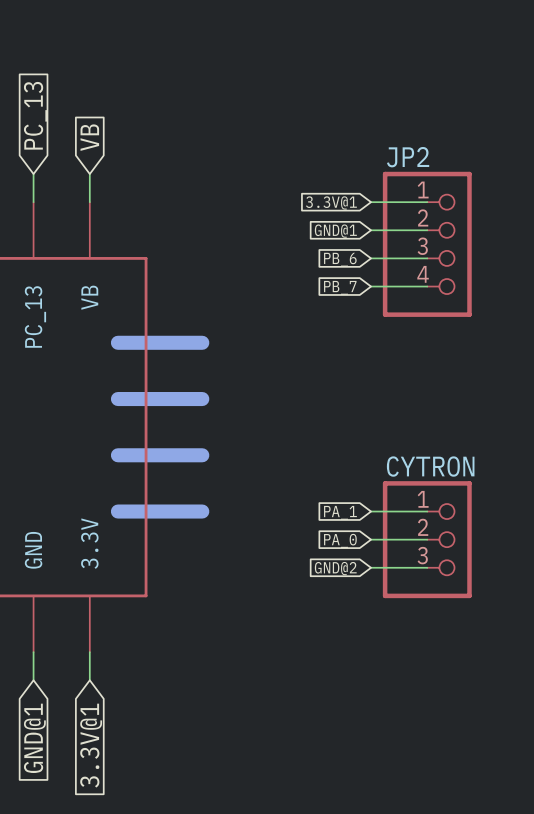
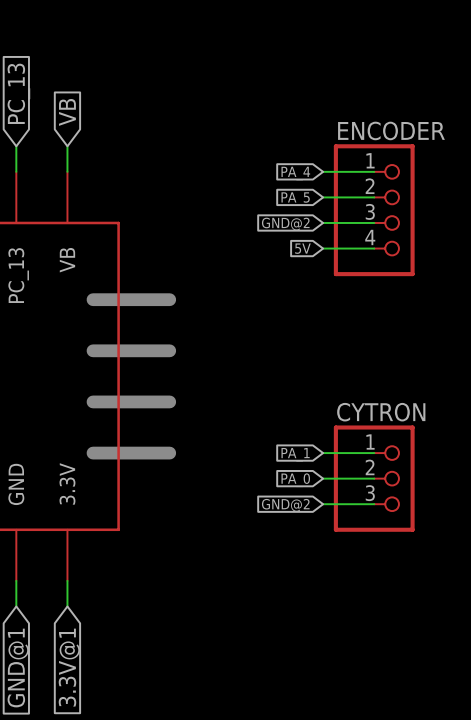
JP2 name: JP2 (408, 157) -> ENCODER (391, 130)
global label: 3.3V@1 (331, 202) -> PA_4 (295, 173)
global label: GND@1 (335, 231) -> PA_5 (295, 199)
global label: PB_6 (340, 259) -> GND@2 (285, 224)
global label: PB_7 (340, 287) -> 5V (302, 248)

